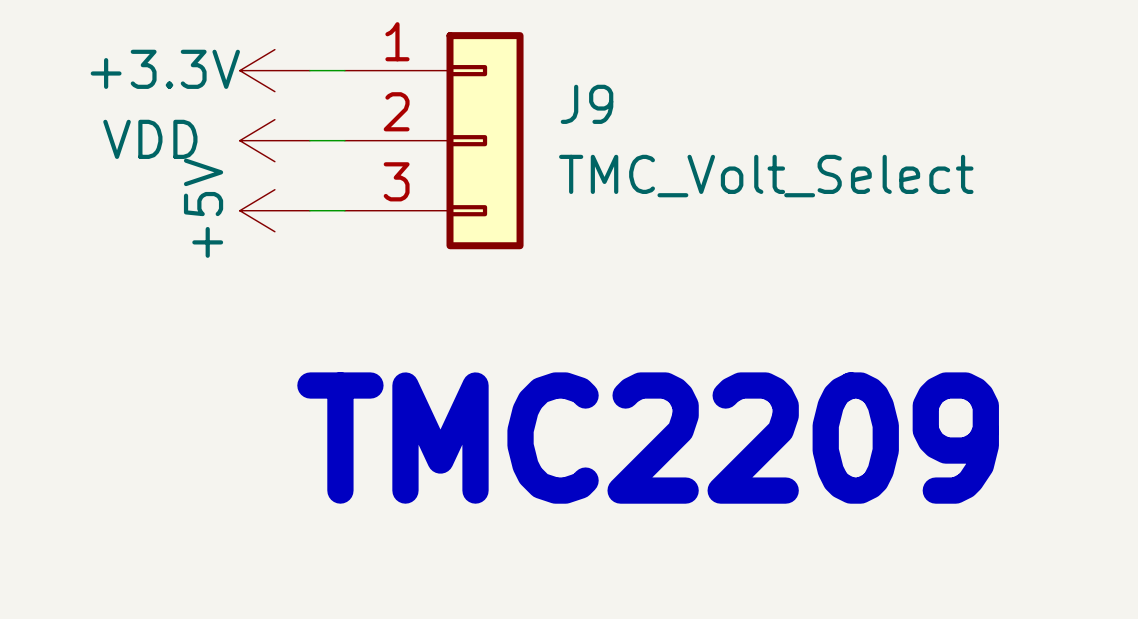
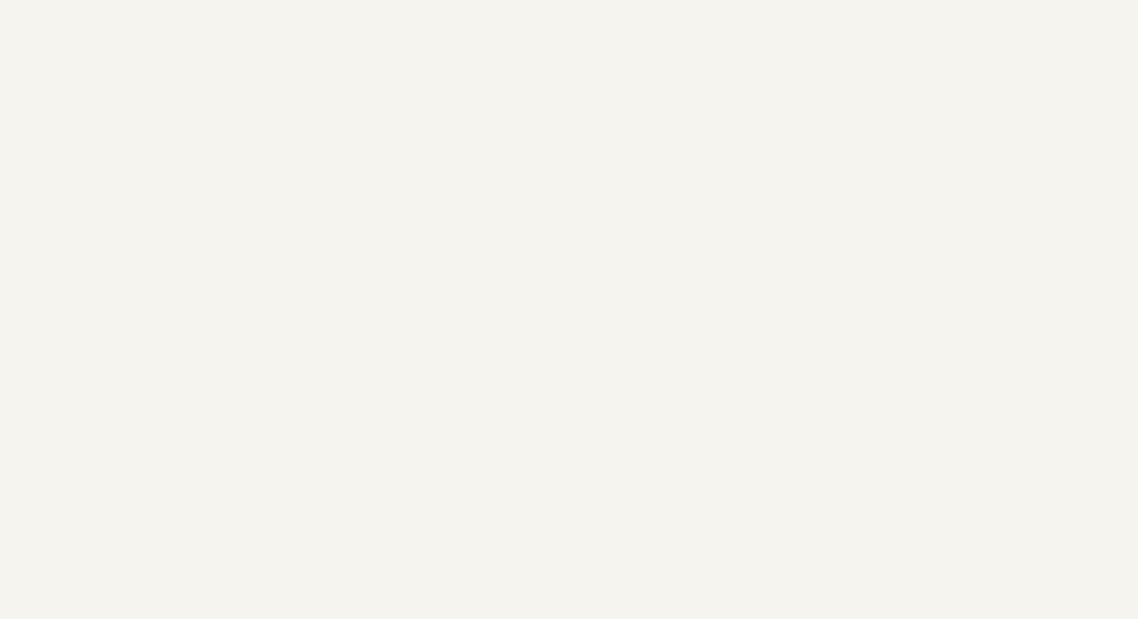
power symbol: +3.3V (274, 70) -> none
wire: (309, 70) (344, 70) -> none
power symbol: VDD (274, 140) -> none
wire: (309, 140) (344, 140) -> none
J9: TMC_Volt_Select (434, 140) -> none
power symbol: +5V (274, 210) -> none
wire: (309, 210) (344, 210) -> none
text: TMC2209 (648, 438) -> none

